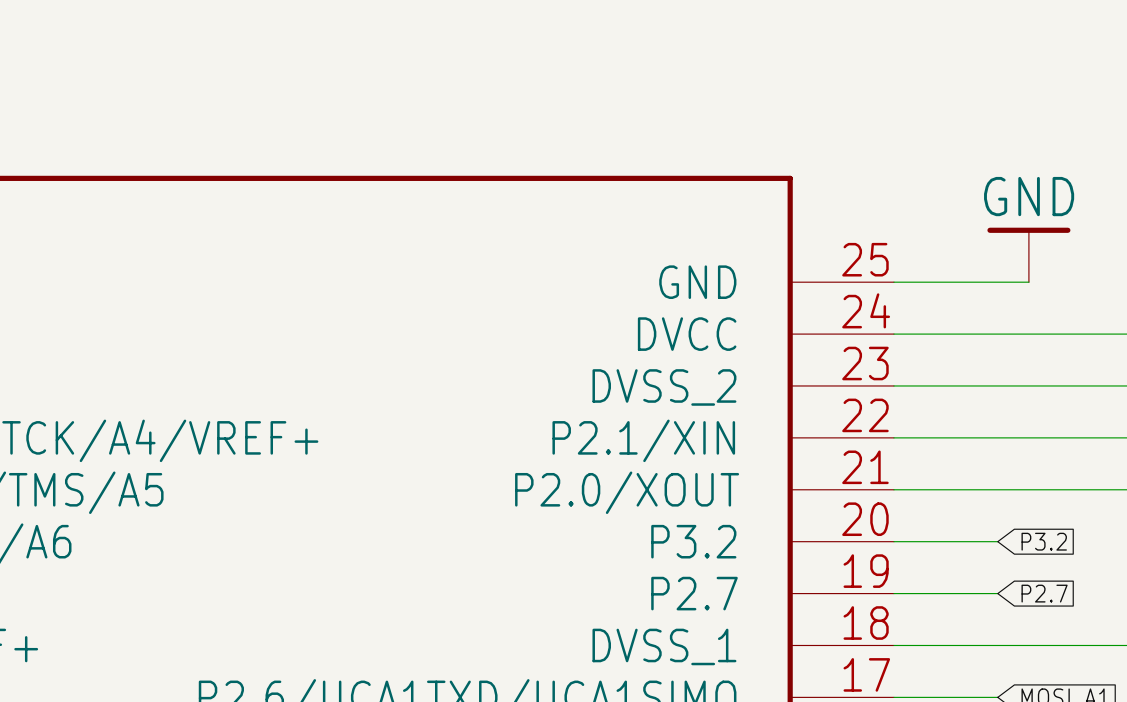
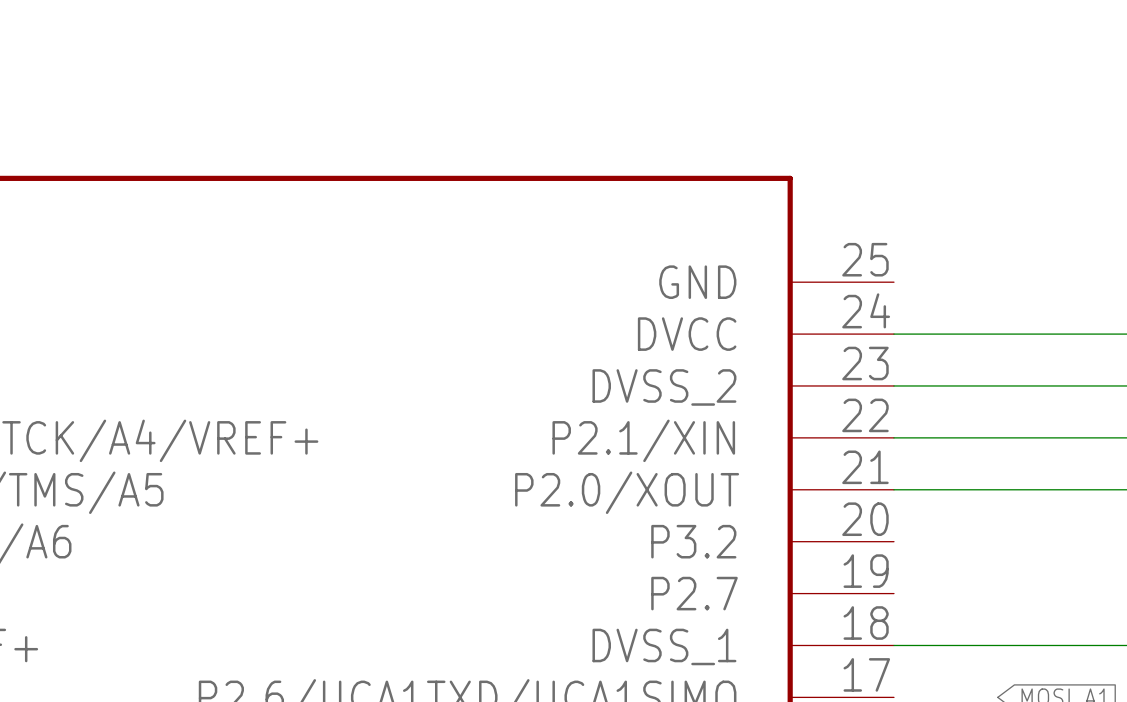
power symbol: GND (1028, 254) -> none
wire: (893, 282) (1028, 282) -> none
wire: (893, 541) (997, 541) -> none
global label: P3.2 (1044, 541) -> none
wire: (893, 593) (997, 593) -> none
global label: P2.7 (1044, 593) -> none
wire: (893, 697) (997, 697) -> none

